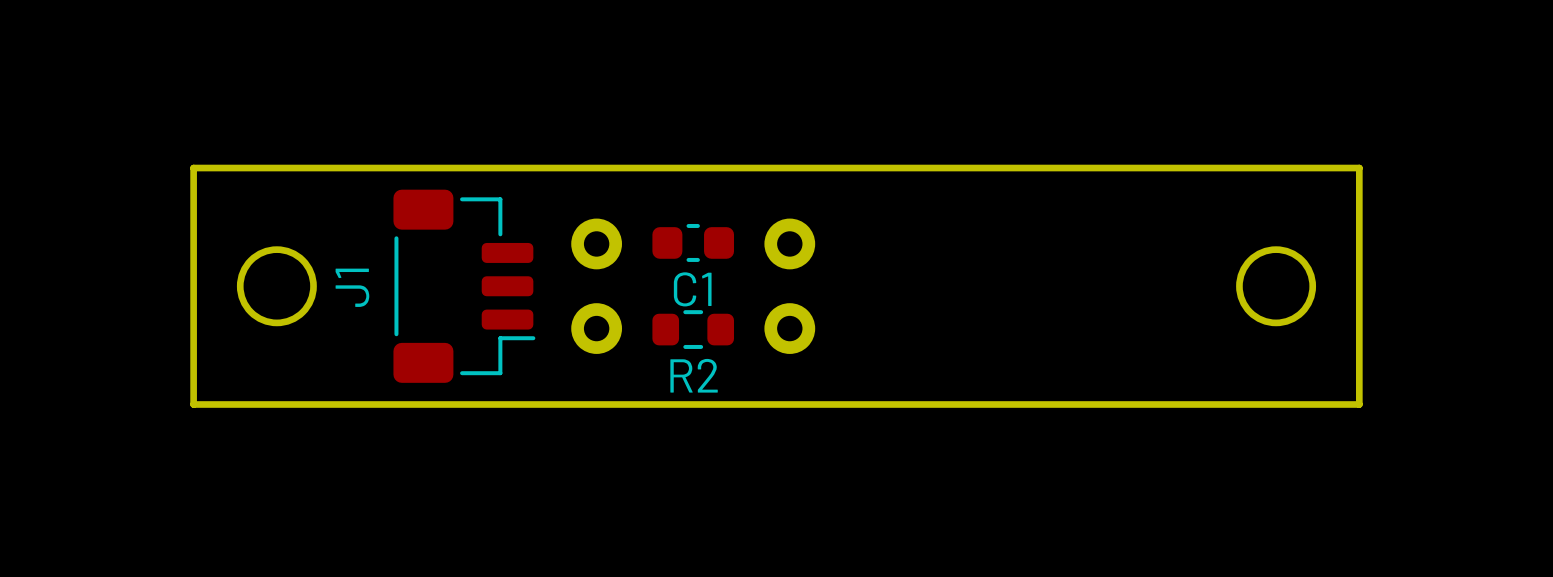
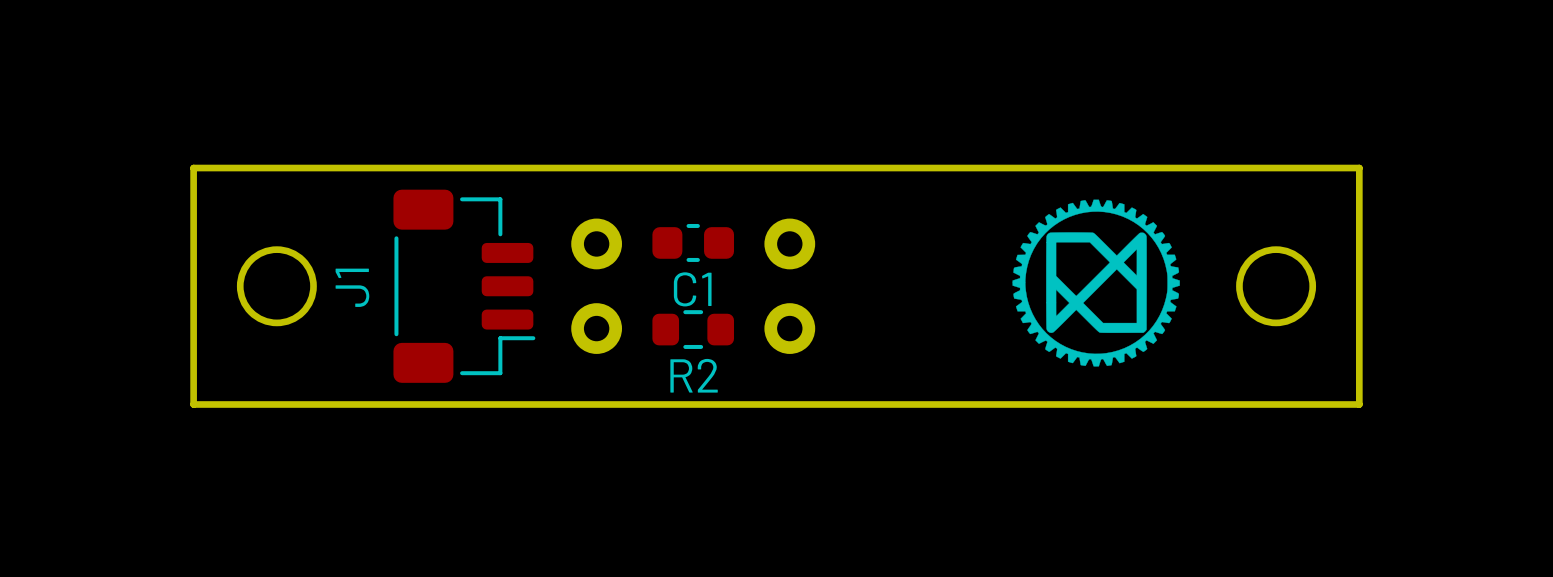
drawing: none -> [1012, 199, 1180, 367]

